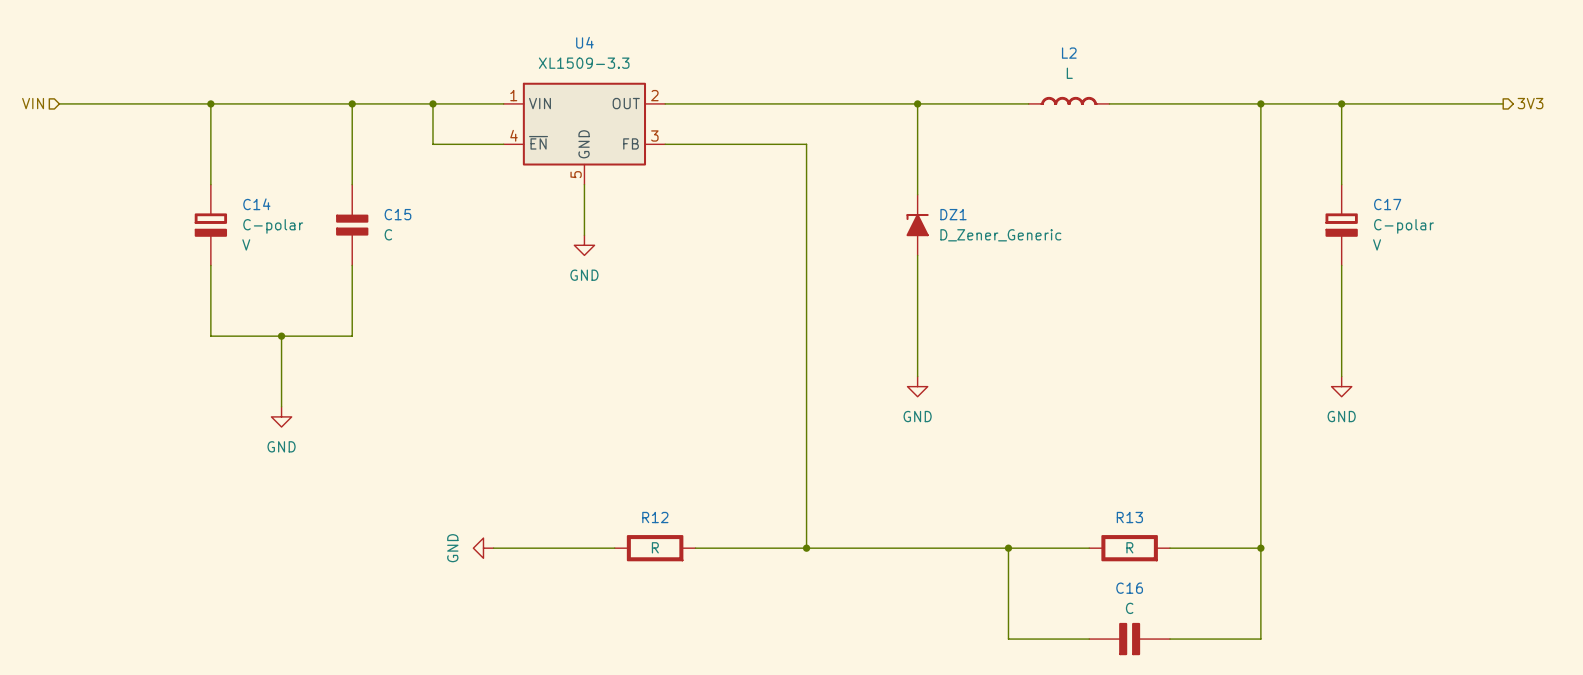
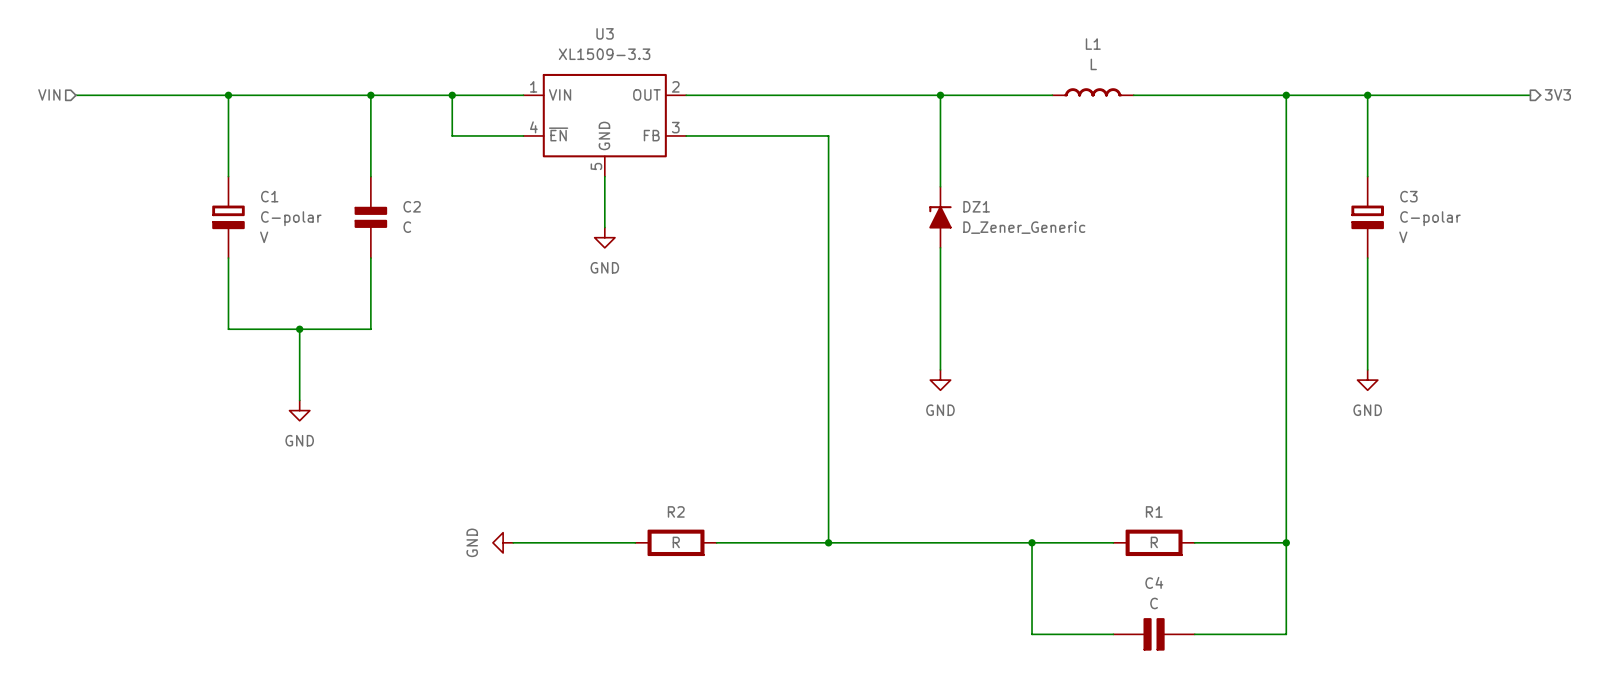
U4 name: U4 (584, 42) -> U3 (605, 33)
L2 name: L2 (1069, 53) -> L1 (1093, 44)
C14 name: C14 (256, 204) -> C1 (269, 196)
C17 name: C17 (1387, 204) -> C3 (1408, 196)
C15 name: C15 (397, 214) -> C2 (412, 206)
R12 name: R12 (655, 517) -> R2 (676, 511)
R13 name: R13 (1129, 517) -> R1 (1154, 511)
C16 name: C16 (1129, 588) -> C4 (1154, 582)

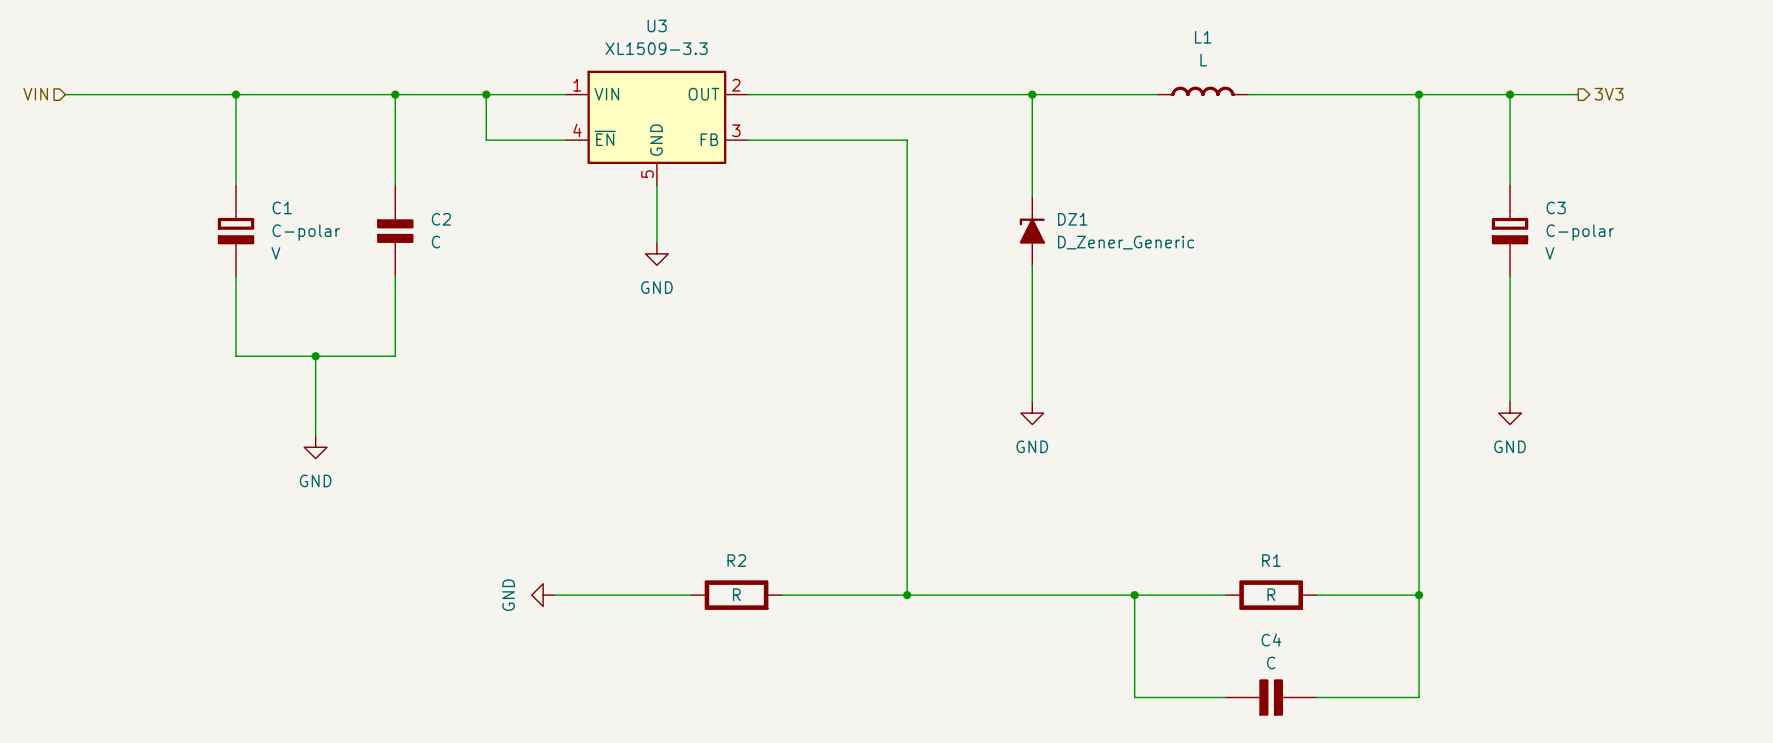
hierarchical label position: 3V3 (1557, 94) -> 3V3 (1609, 94)
wire: (1428, 95) (1530, 95) -> none

